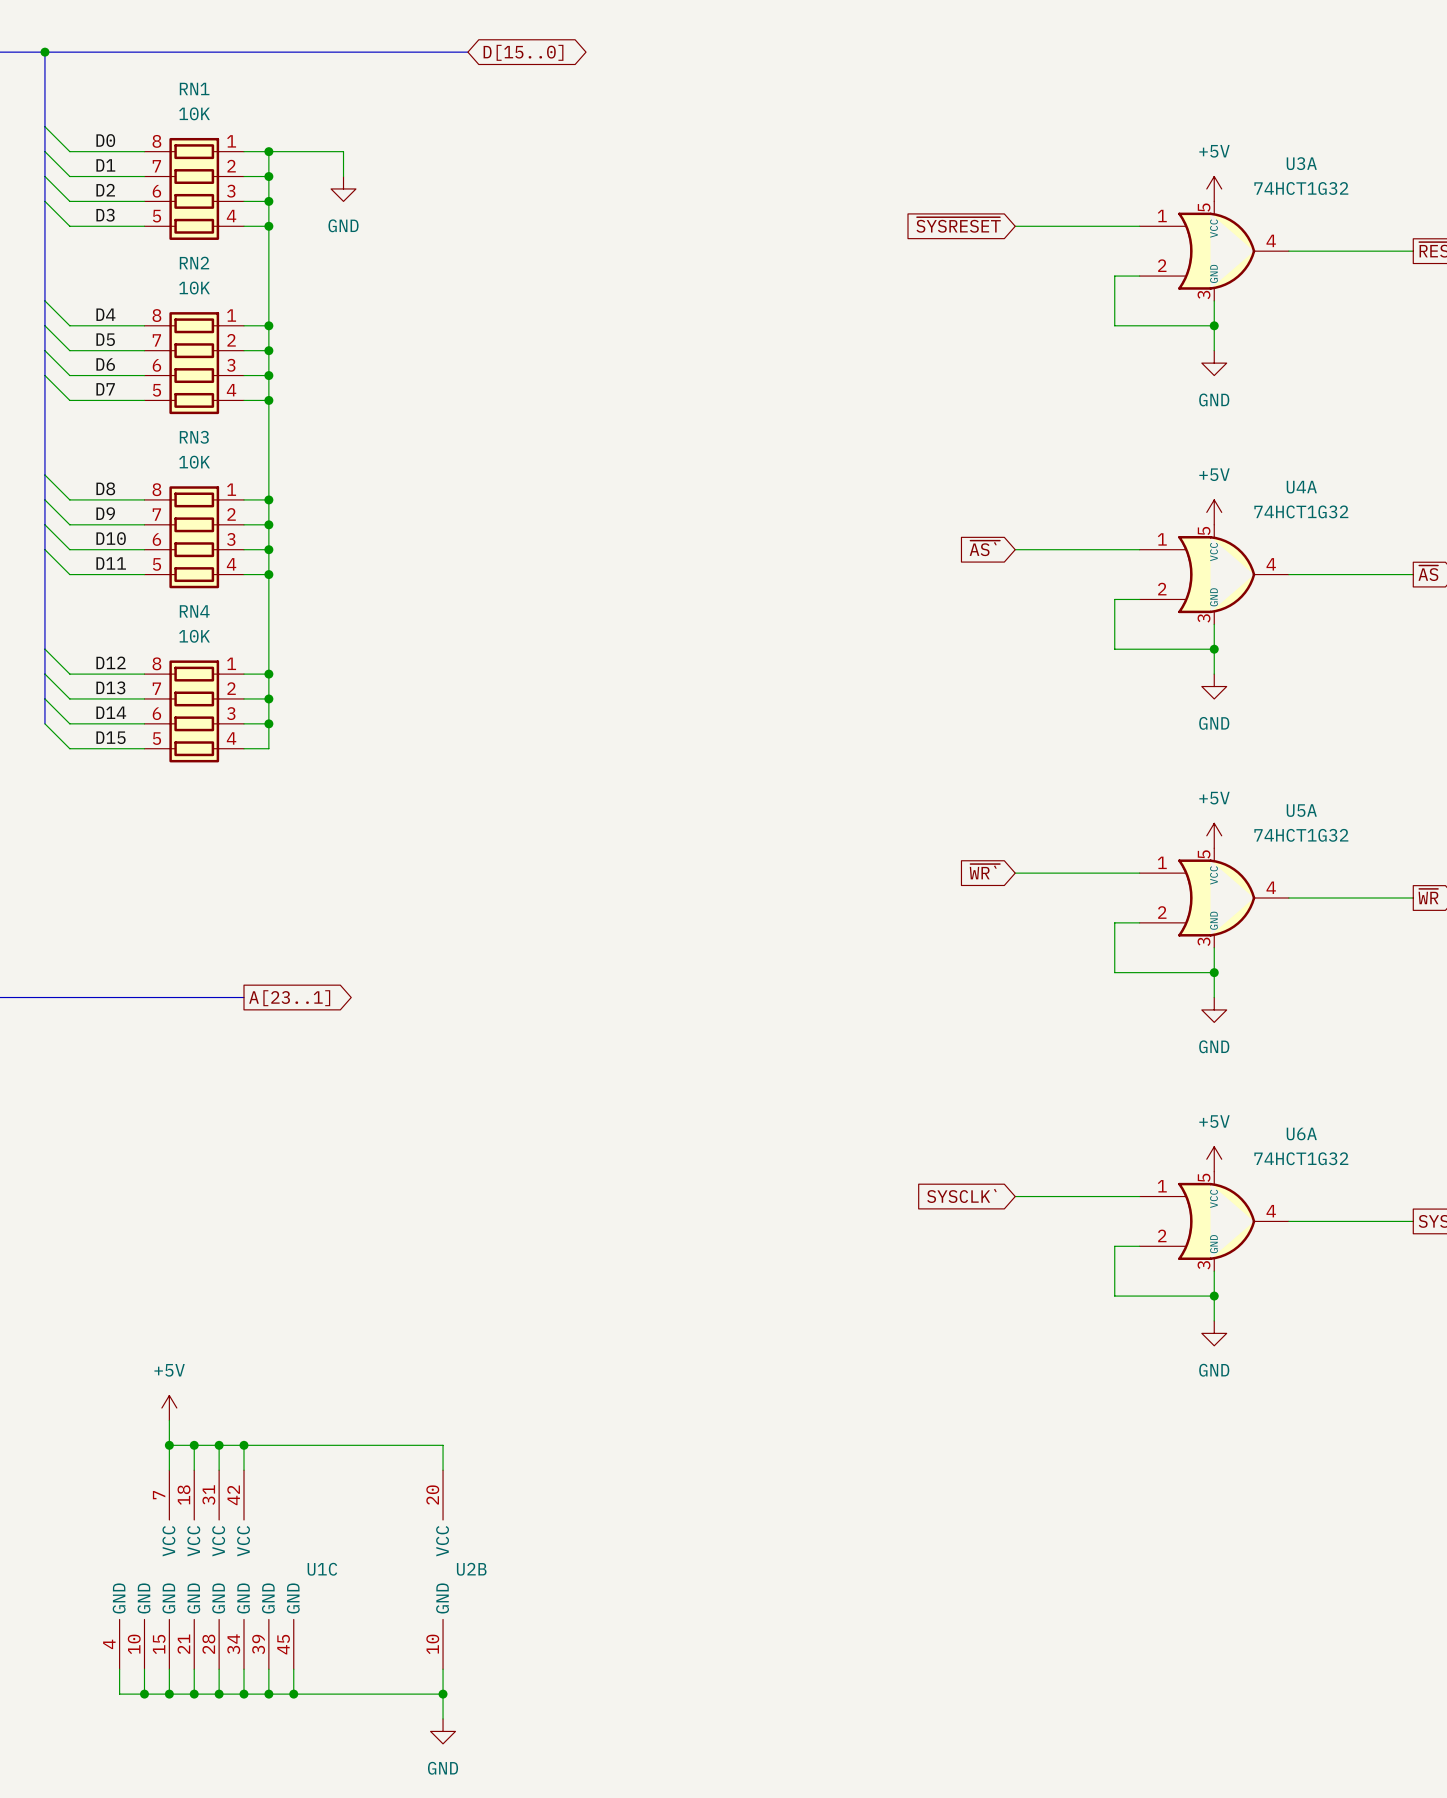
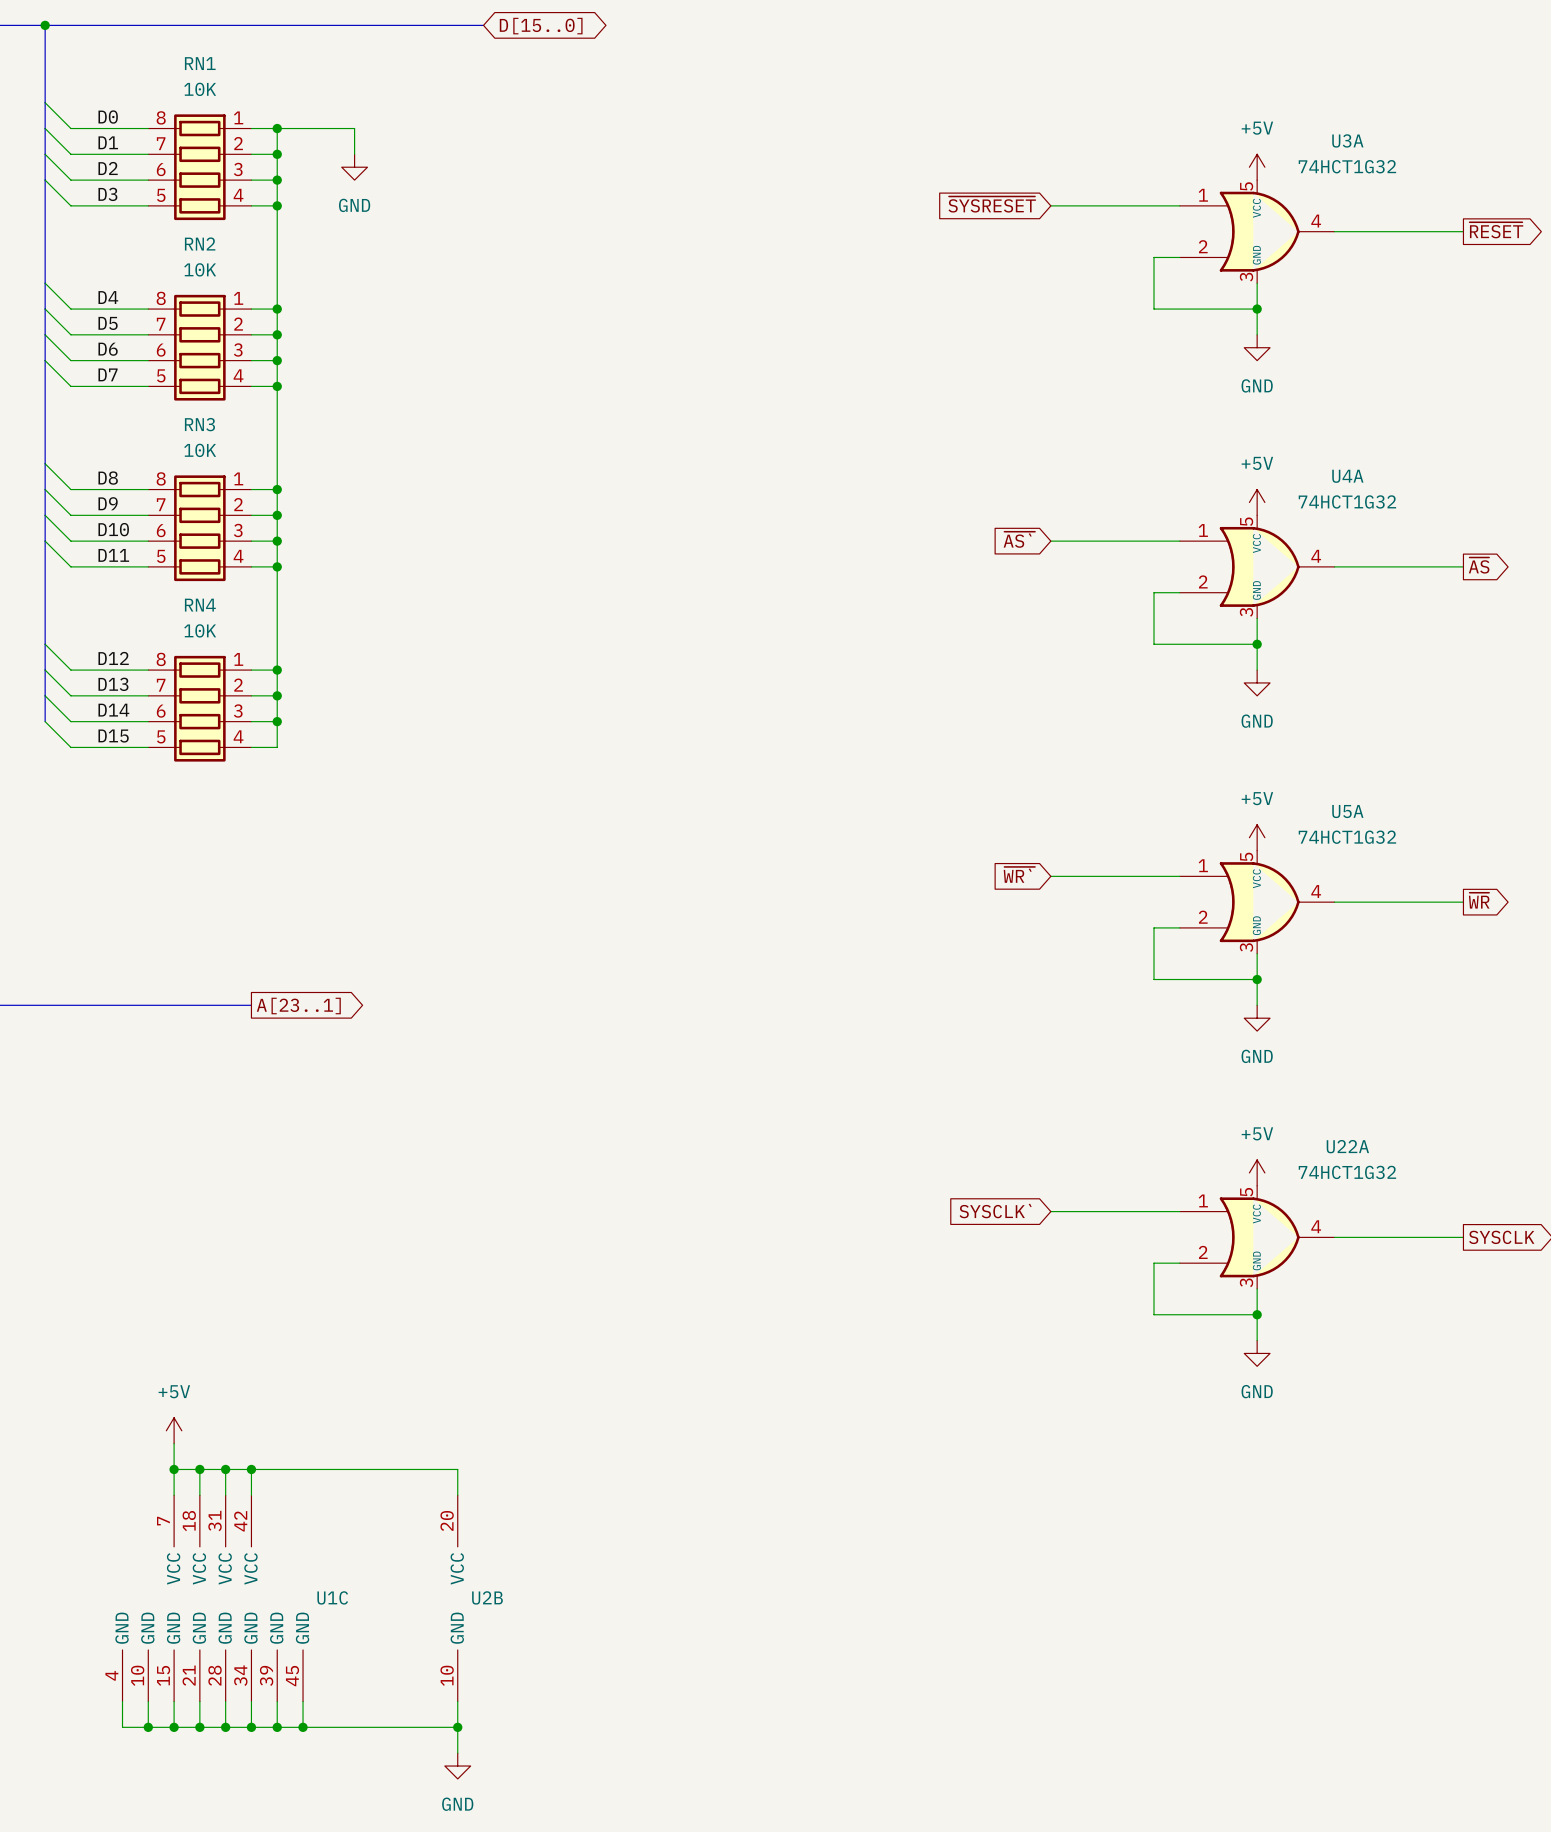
U6A name: U6A (1301, 1133) -> U22A (1347, 1146)

